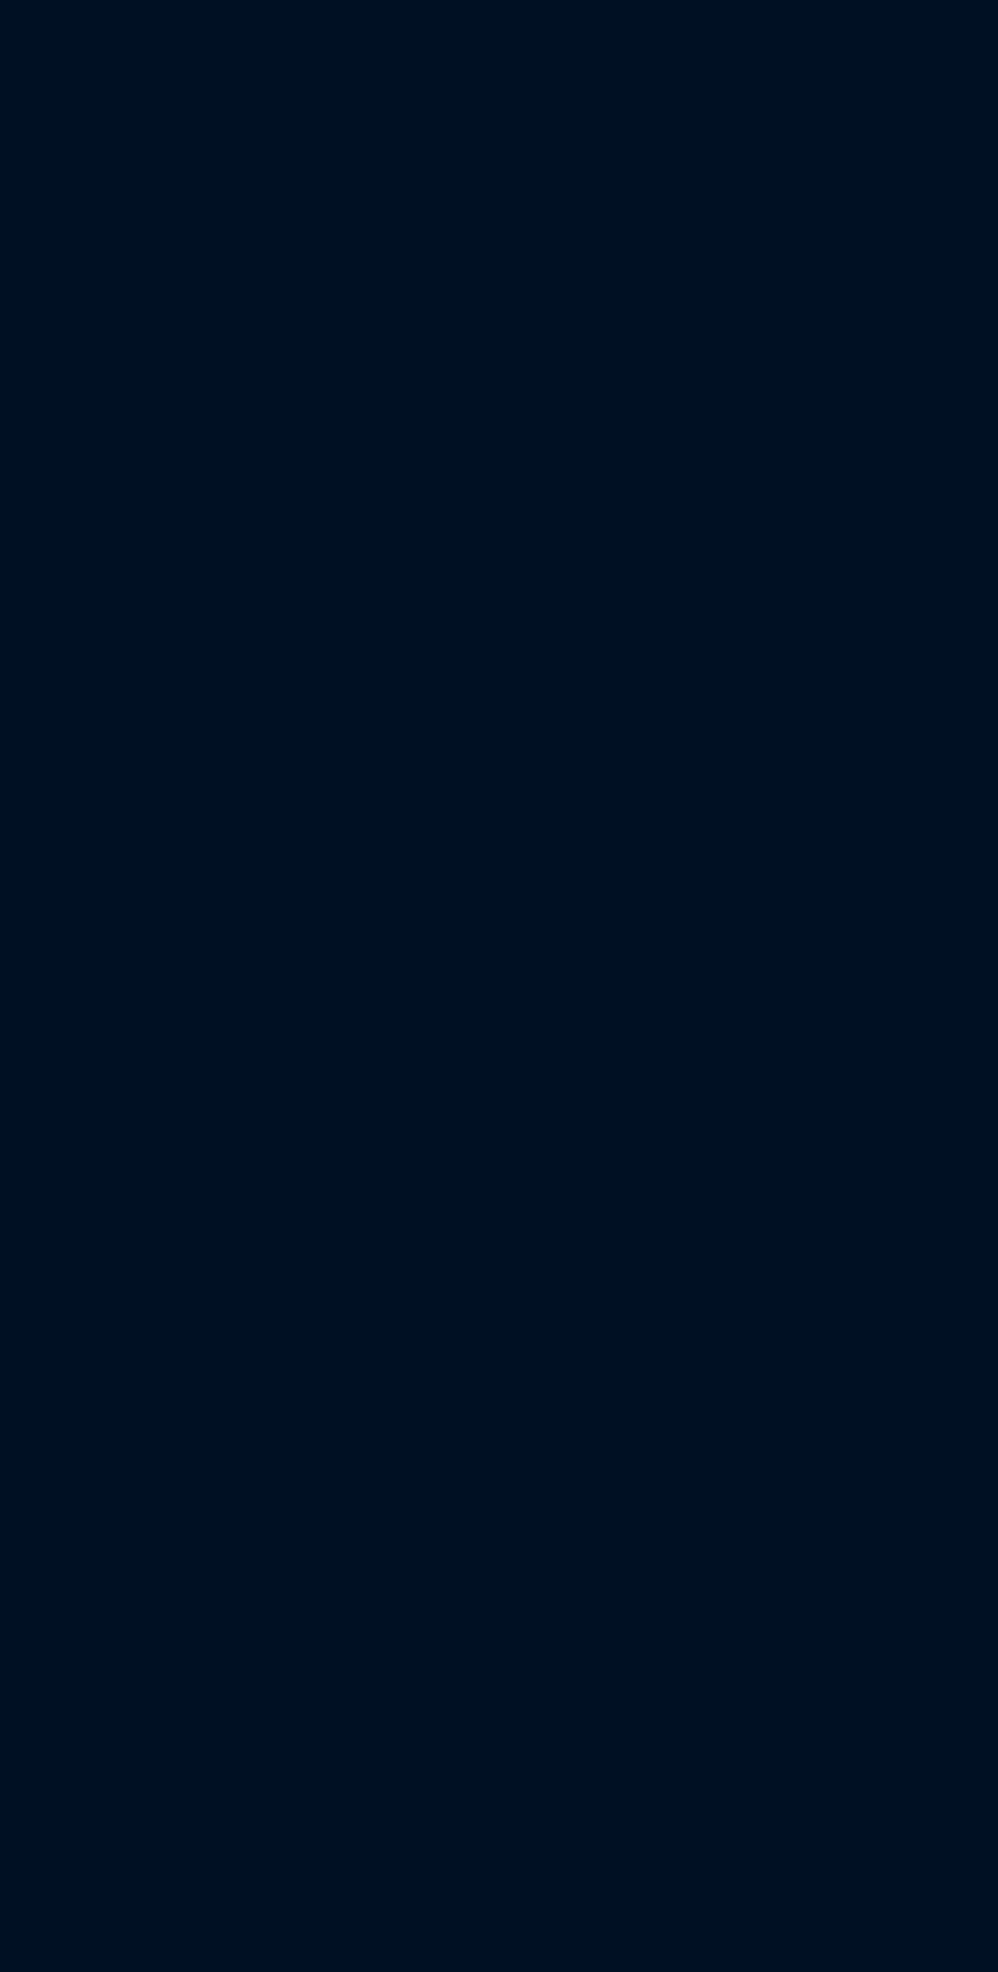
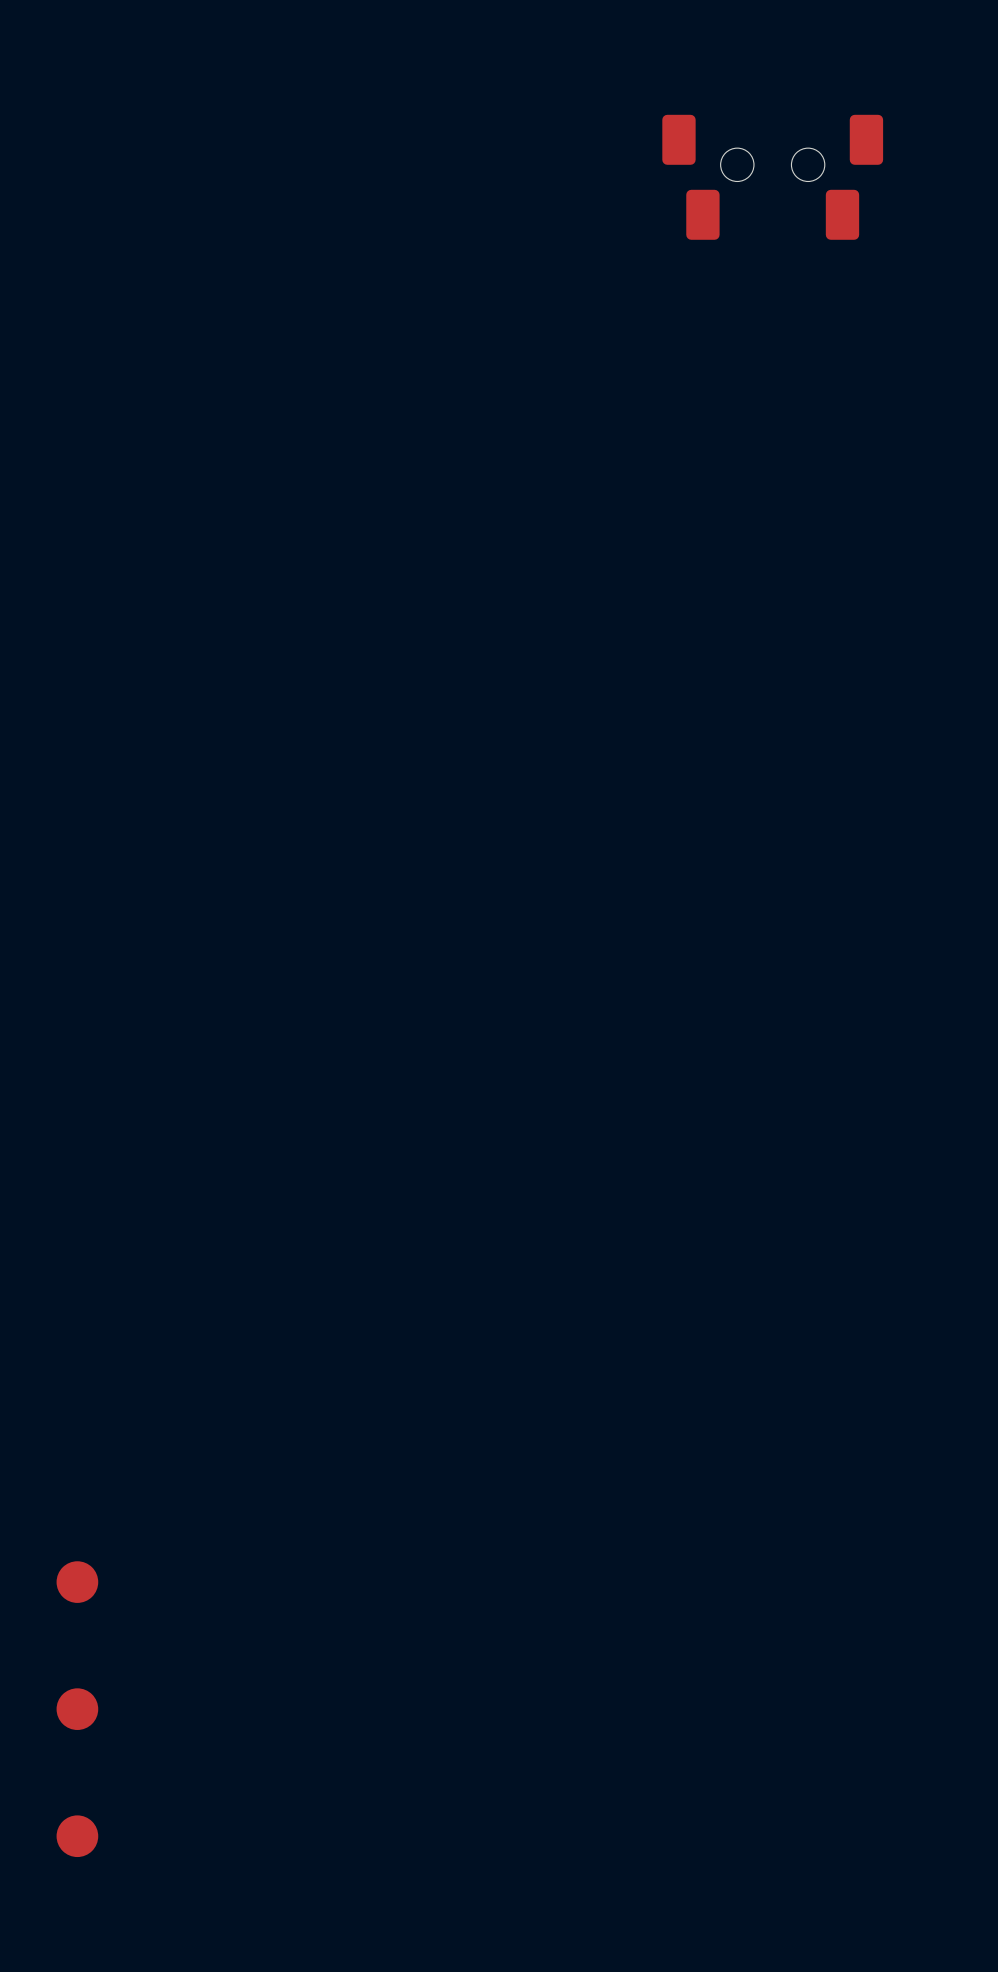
part: none -> (772, 177)
part: none -> (77, 1582)
part: none -> (77, 1709)
part: none -> (77, 1836)

